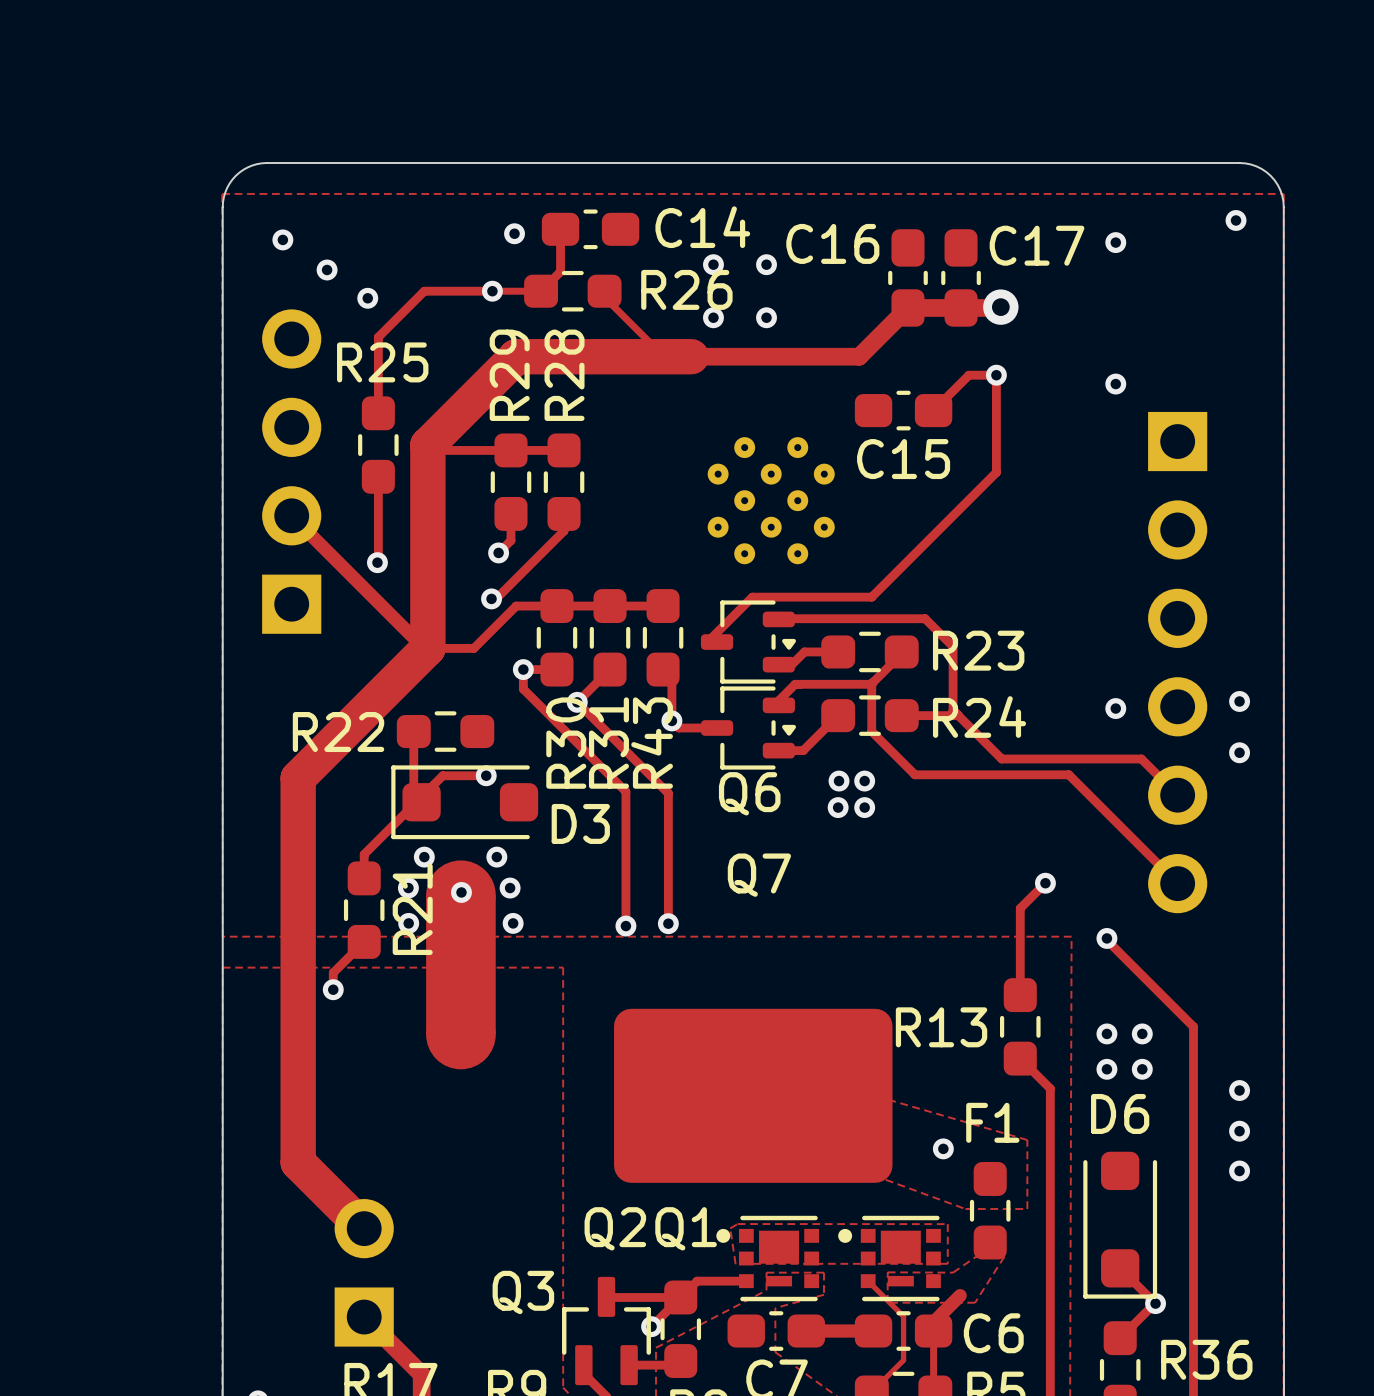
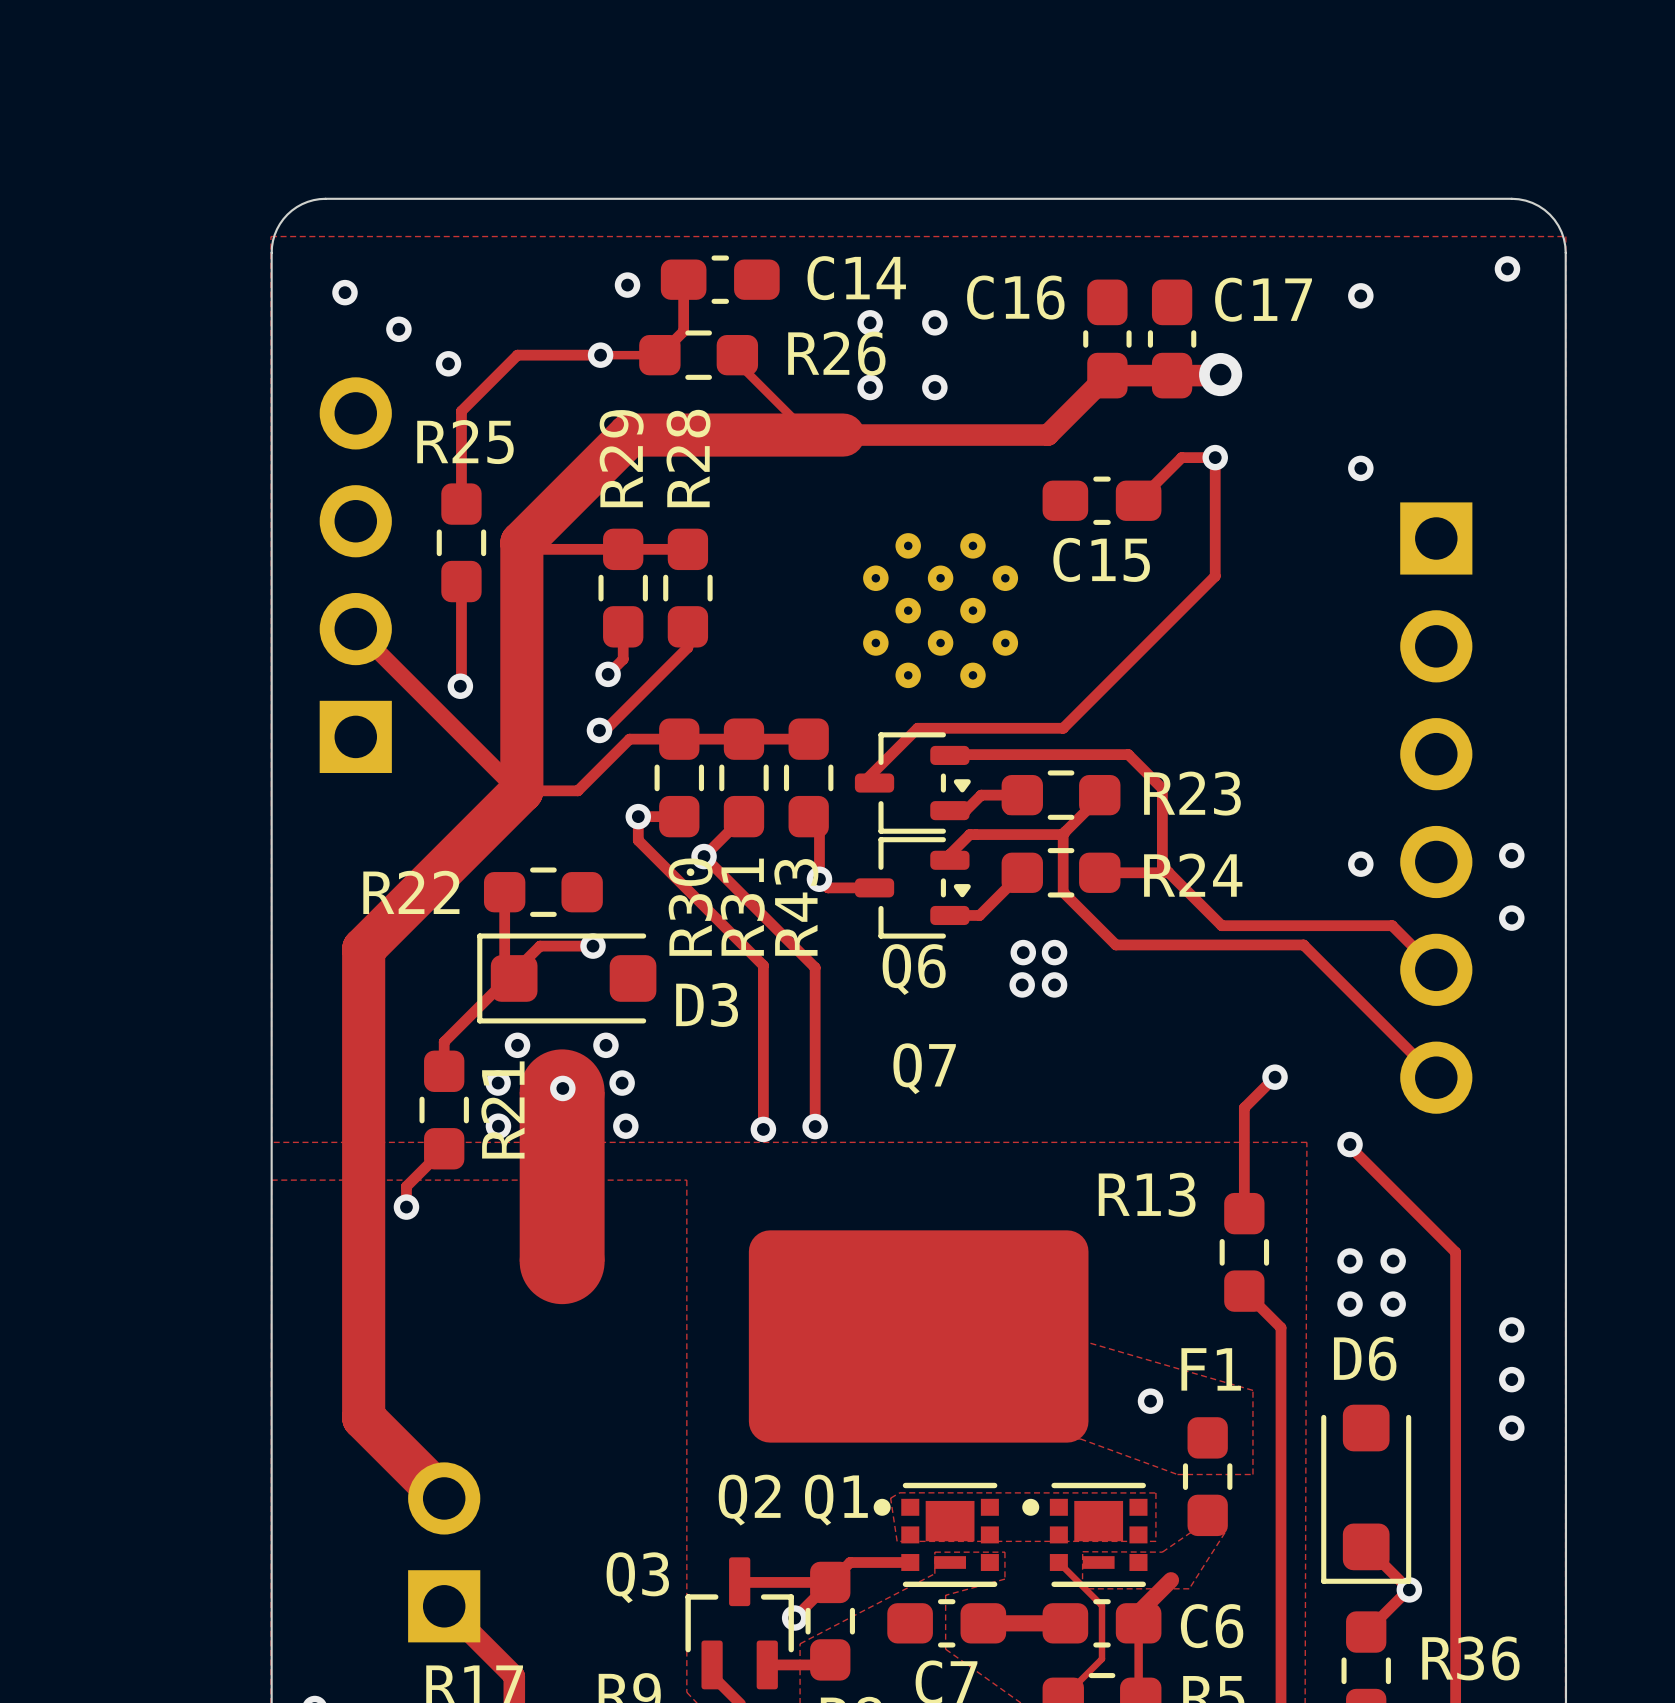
R13 name position: R13 (941, 1027) -> R13 (1147, 1194)

